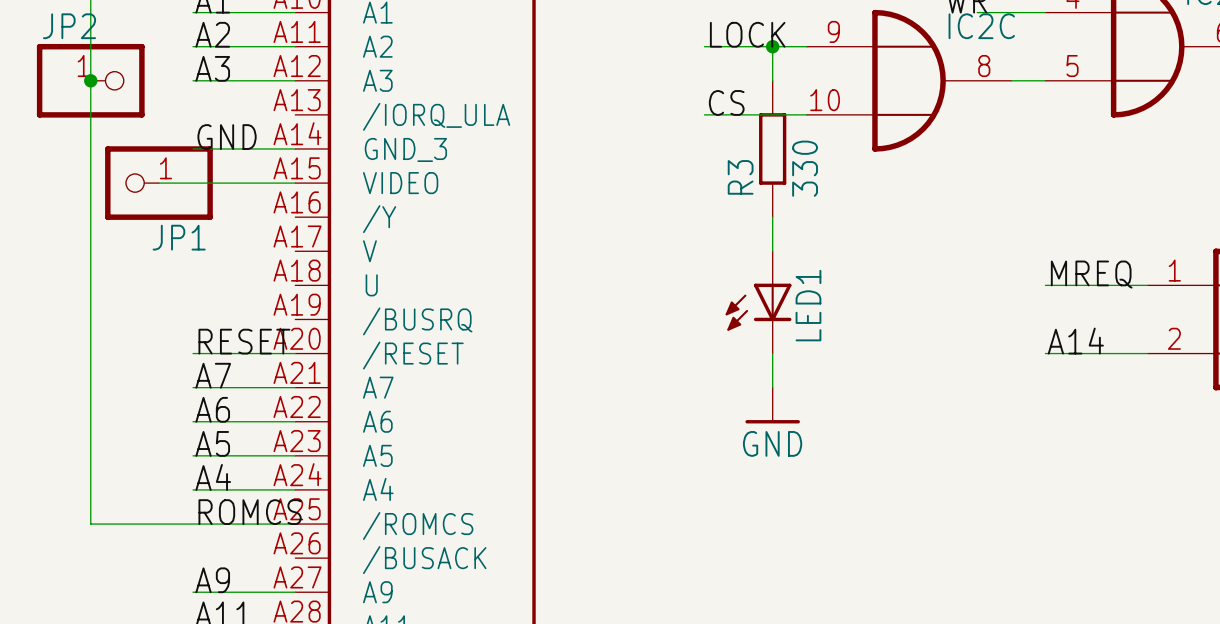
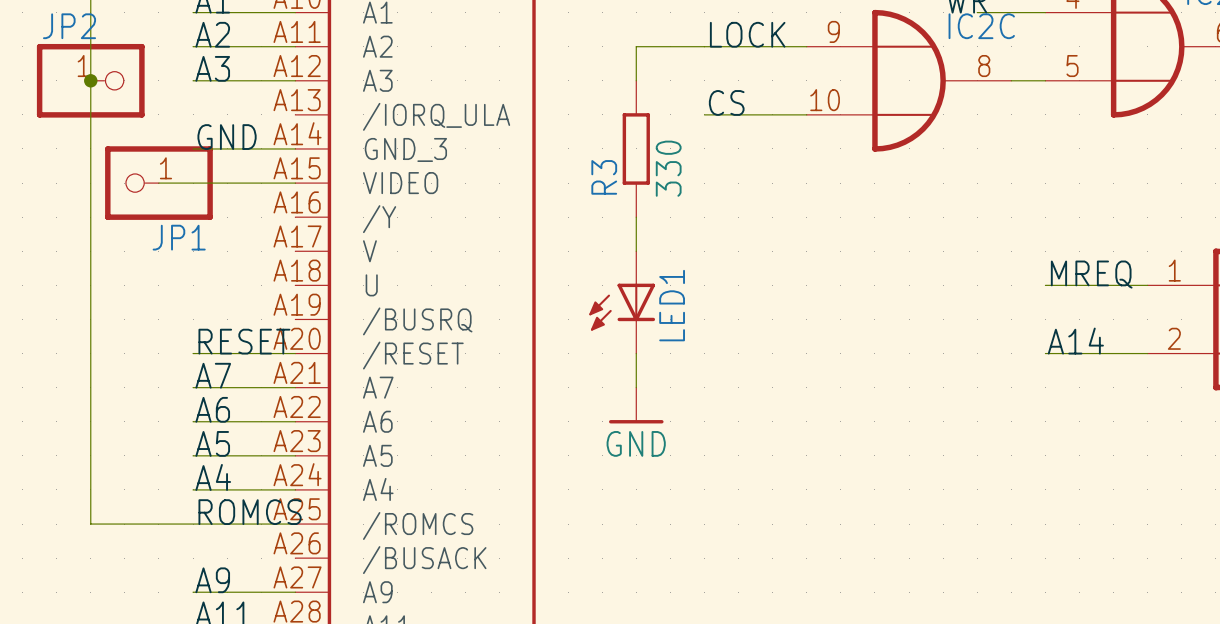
wire: none -> (704, 46) (636, 46) (636, 80)
wire: (772, 46) (772, 80) -> none
junction: (772, 46) -> none
R3 position: (772, 148) -> (636, 148)
wire: (772, 217) (772, 251) -> (636, 217) (636, 251)
LED1 position: (758, 302) -> (622, 302)
wire: (772, 353) (772, 387) -> (636, 353) (636, 387)
power symbol position: GND (772, 405) -> GND (636, 405)

